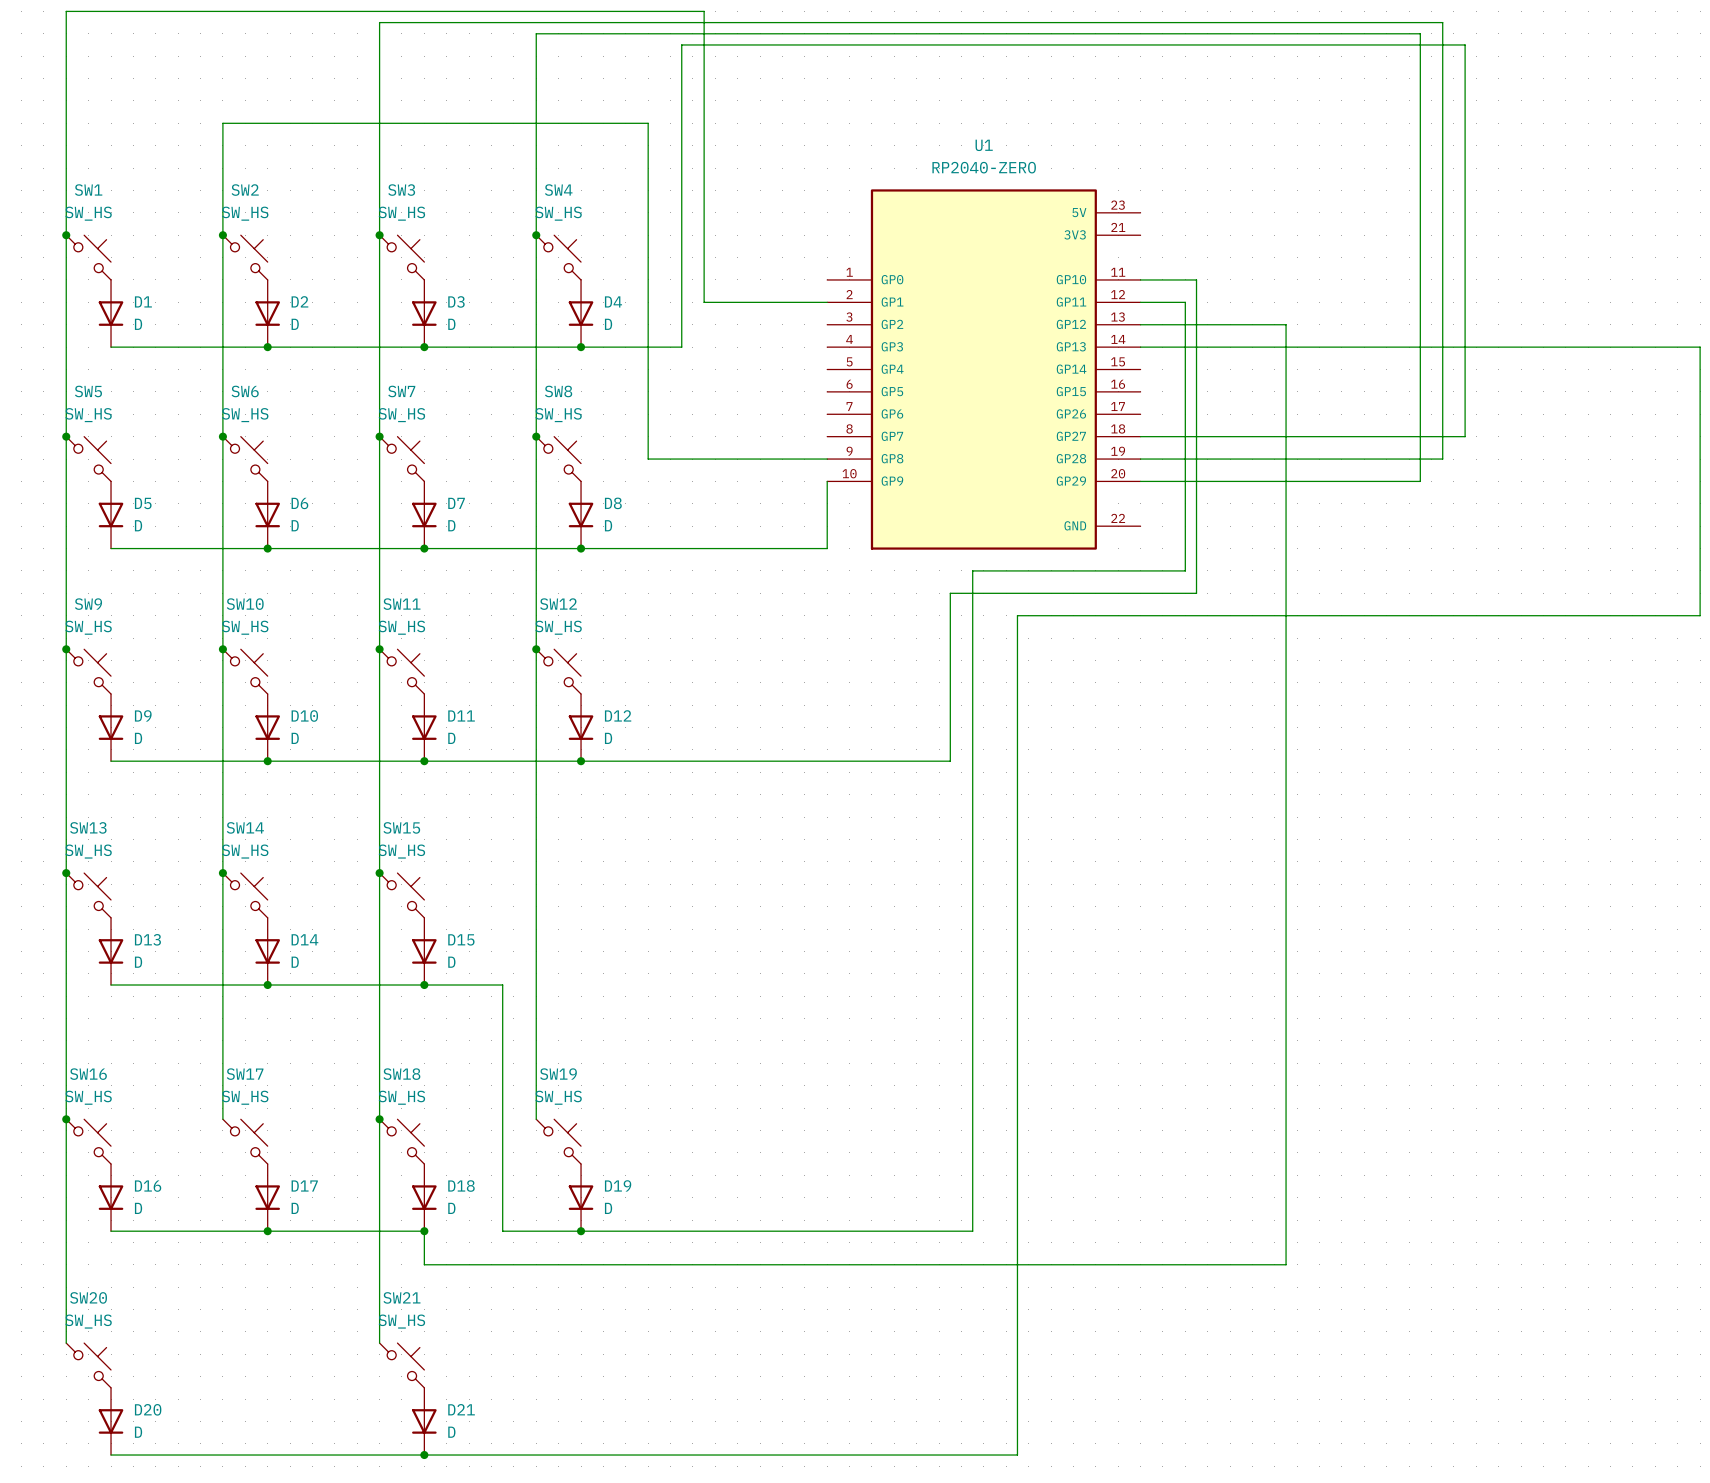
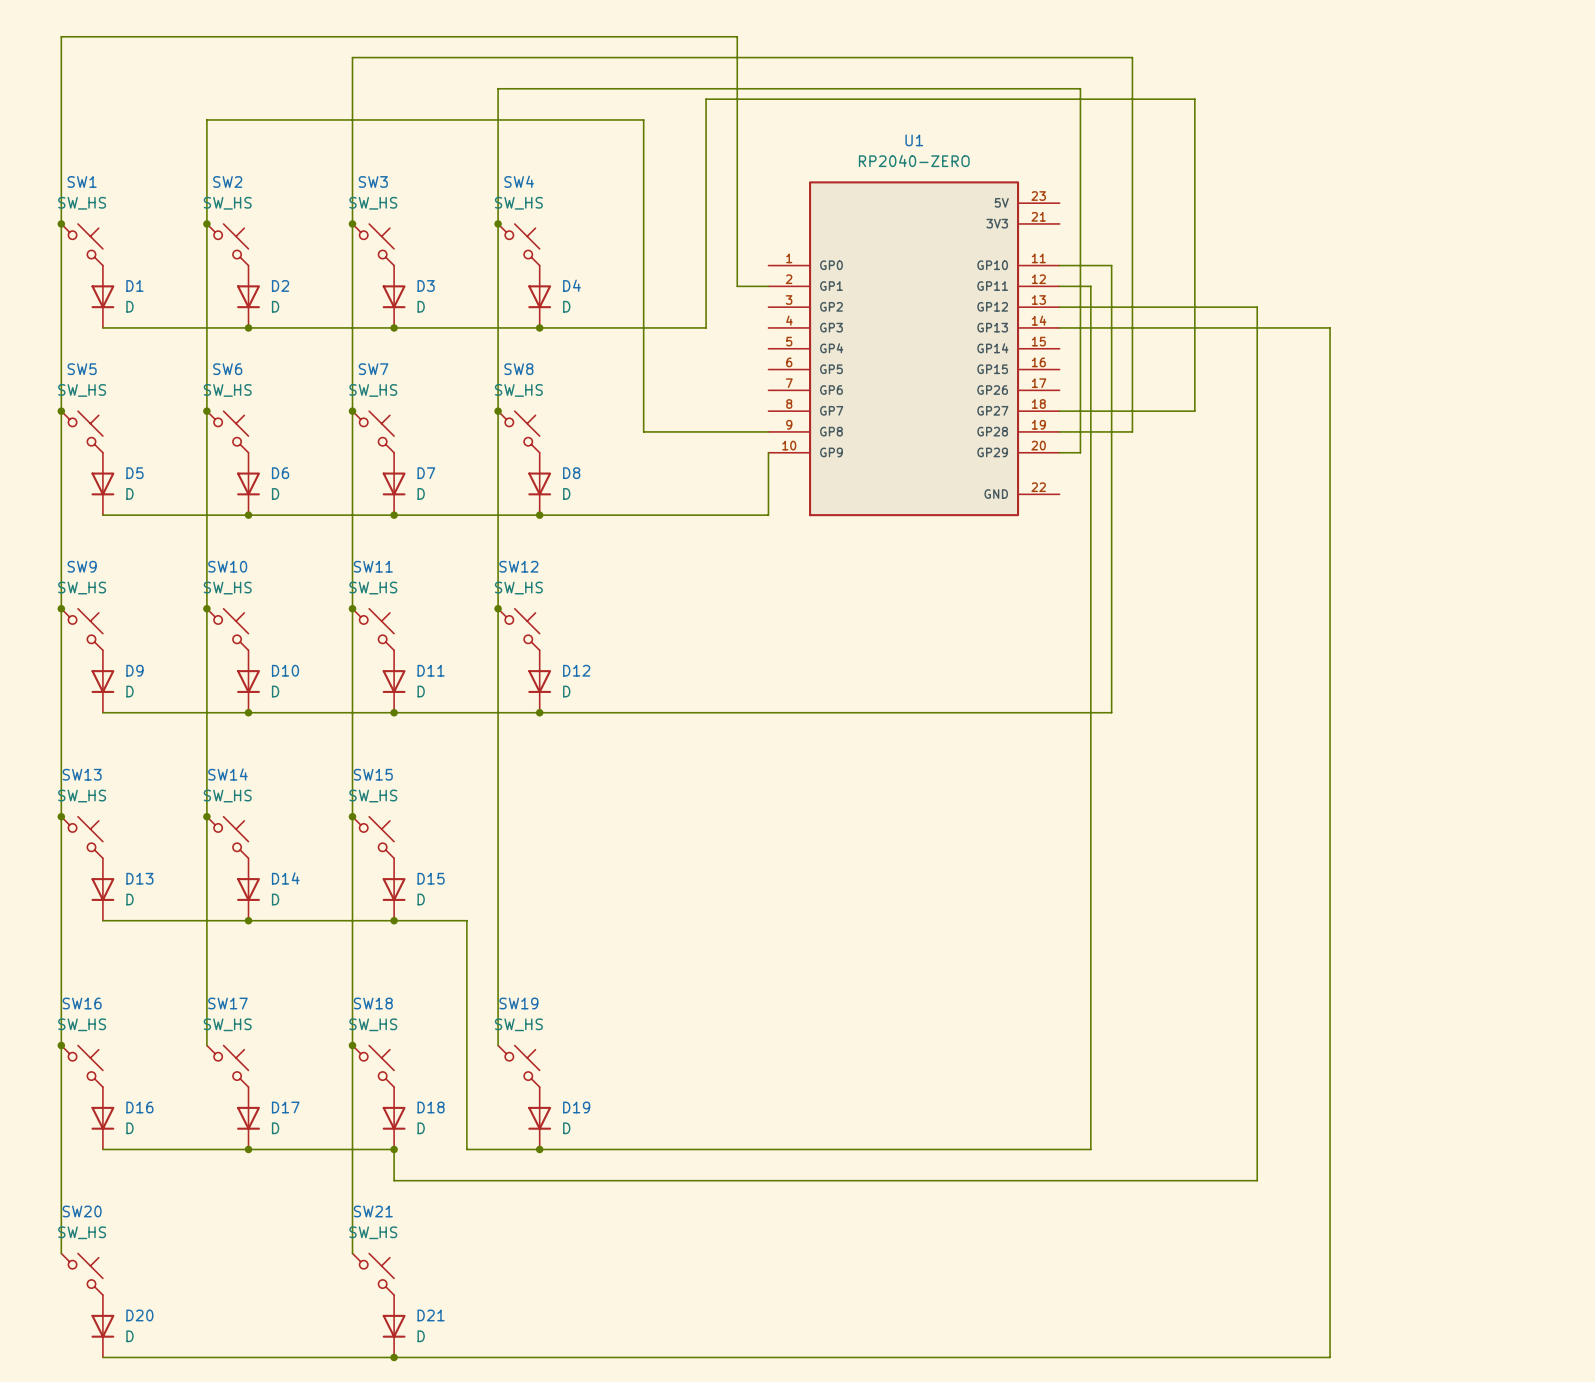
wire: (66, 33) (66, 11) (704, 11) (704, 302) (793, 302) -> (61, 36) (498, 36)
wire: (536, 33) (536, 89) -> none
wire: (793, 33) (1420, 33) (1420, 481) (1162, 481) -> (498, 88) (1080, 88) (1080, 452)
wire: none -> (737, 36) (737, 286)
wire: (379, 56) (379, 22) (1442, 22) (1442, 459) (1218, 459) -> (352, 57) (1132, 57) (1132, 431)
wire: (648, 123) (648, 459) (692, 459) -> (602, 119) (643, 119) (643, 431)
wire: (1174, 302) (1185, 302) (1185, 570) (972, 570) (972, 1231) -> (1090, 286) (1090, 1149) (903, 1149)
wire: (681, 347) (681, 44) (1465, 44) (1465, 436) (1286, 436) (1286, 1264) -> (633, 327) (706, 327) (706, 99) (1194, 99) (1194, 307) (1257, 307) (1257, 1180) (1194, 1180)
wire: (1431, 347) (1700, 347) (1700, 615) (1017, 615) (1017, 1455) -> (1330, 327) (1330, 1357) (945, 1357)
wire: (1196, 593) (950, 593) (950, 761) -> (1111, 556) (1111, 712) (882, 712)

